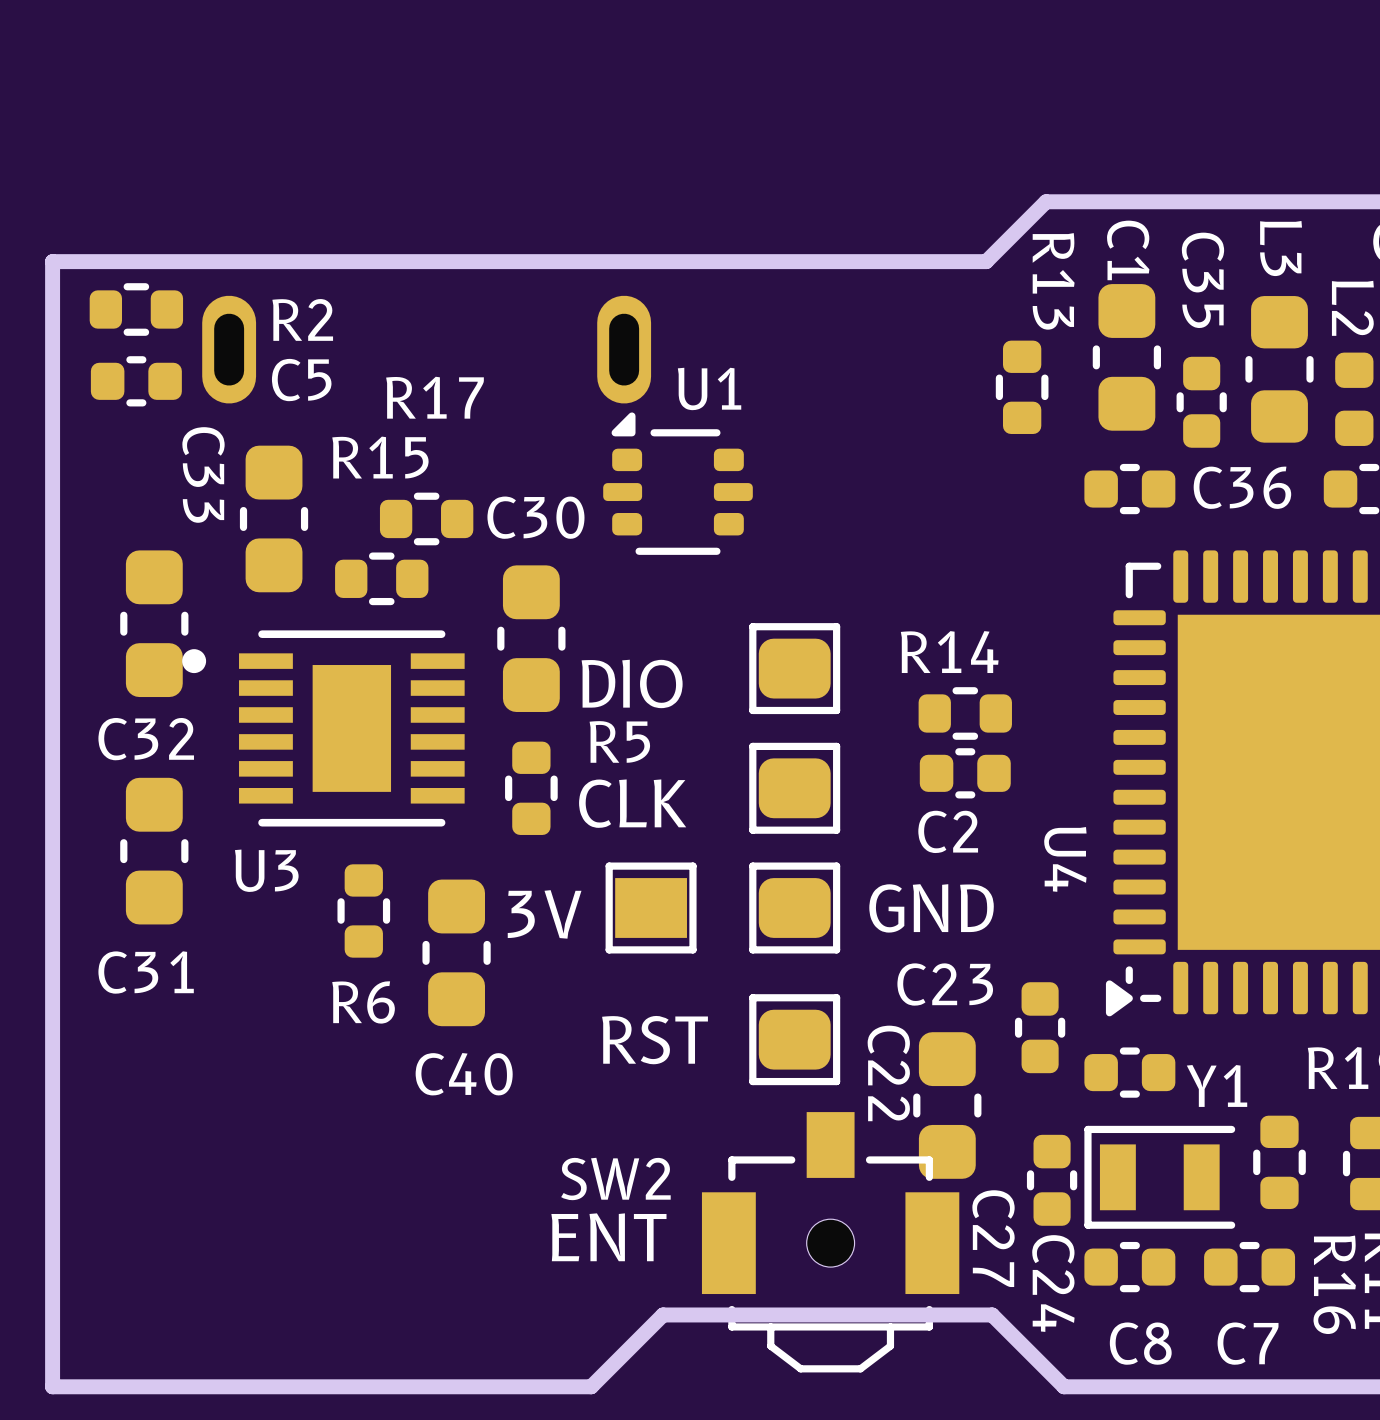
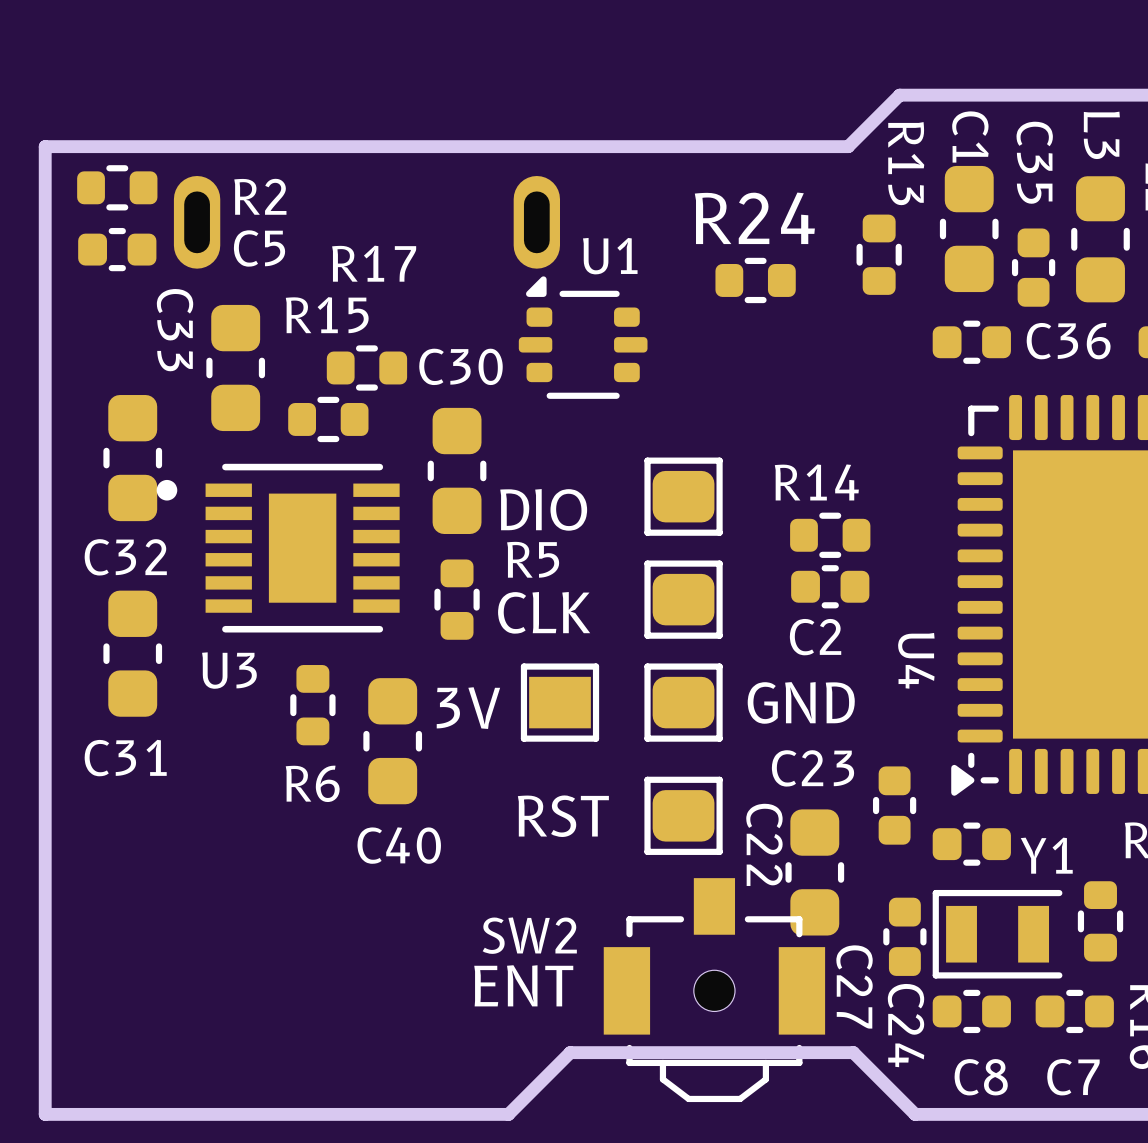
R24: none -> (755, 280)

